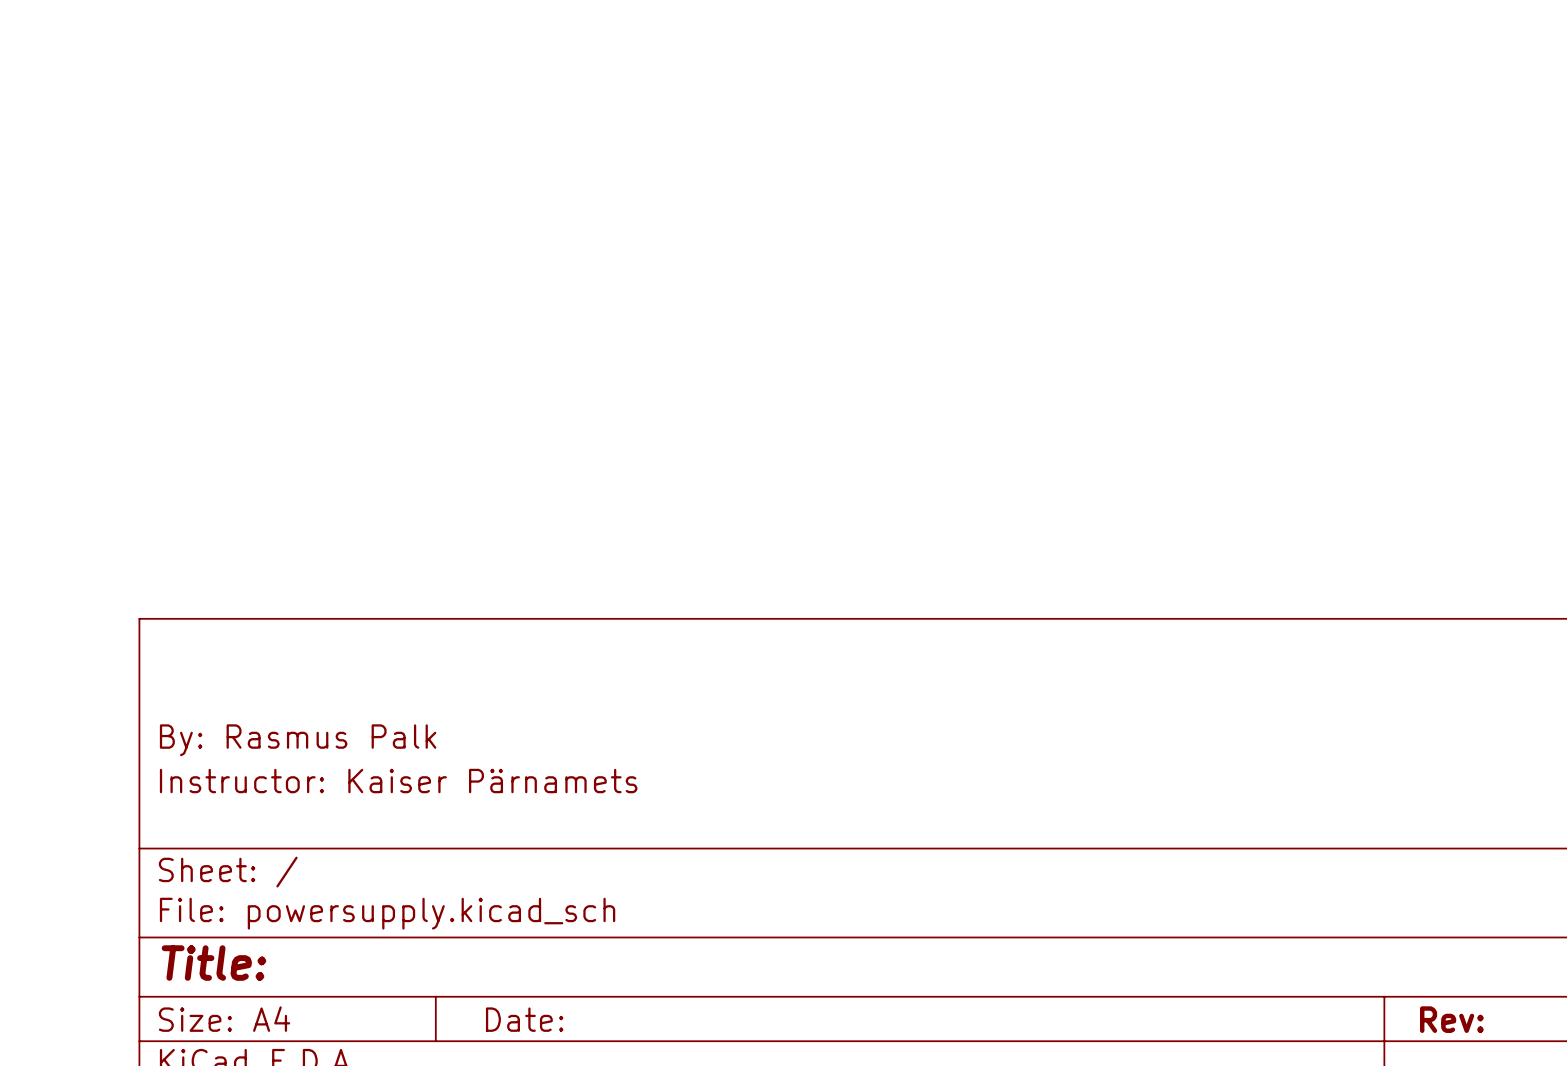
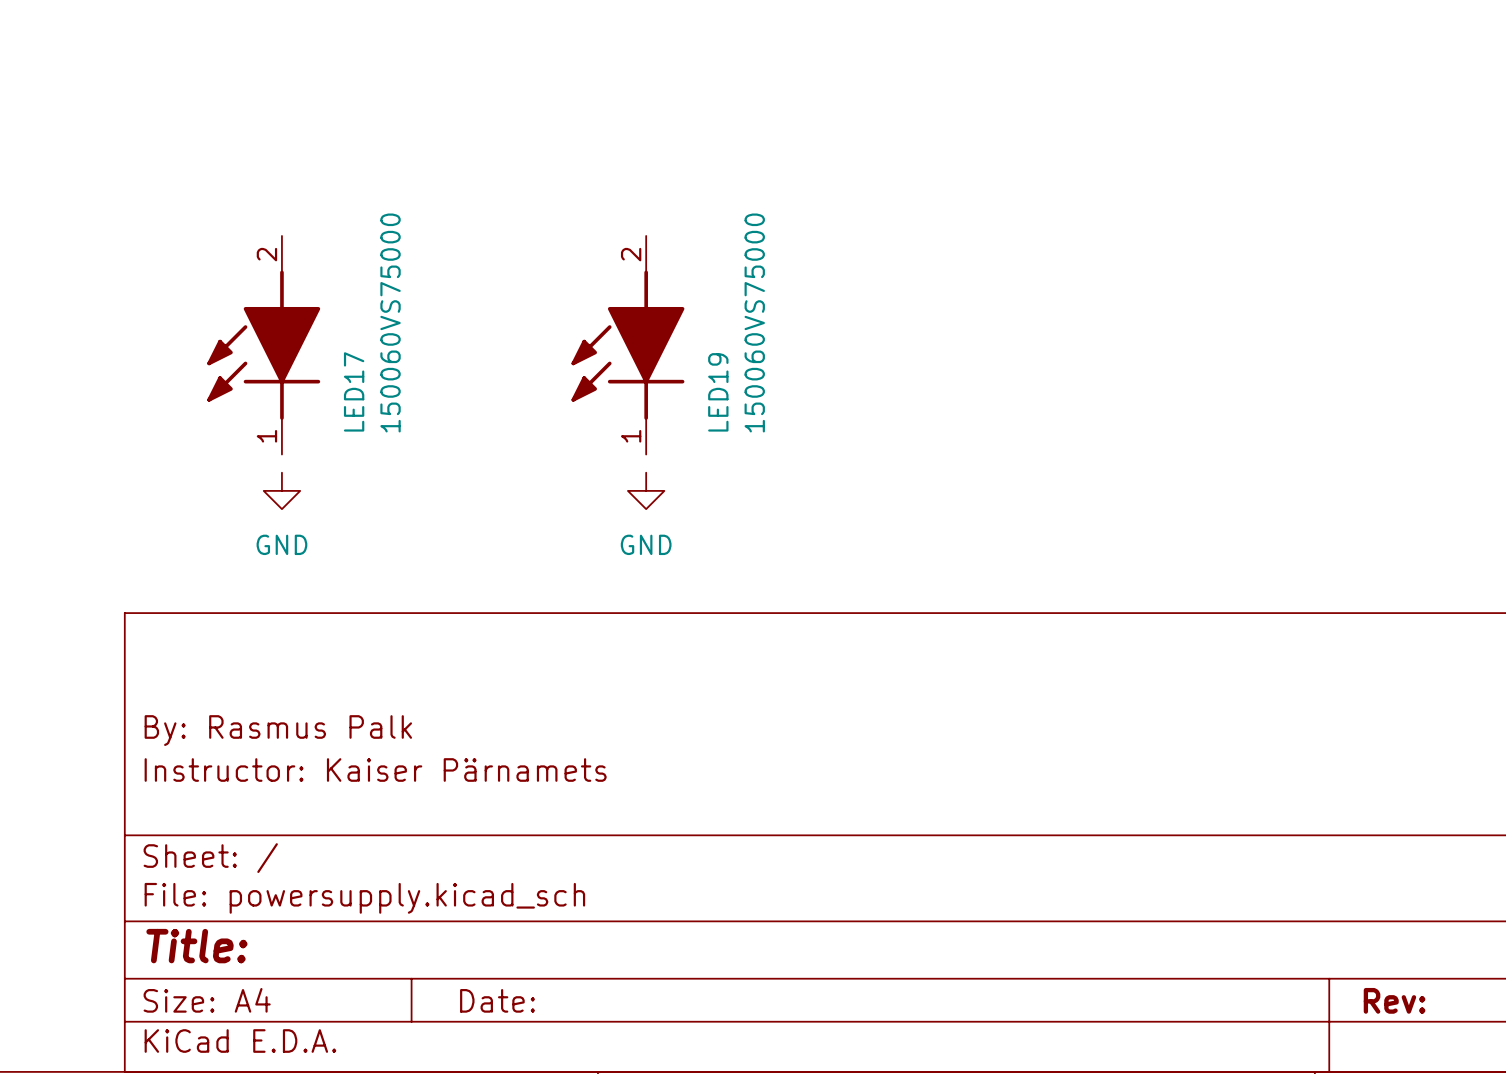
LED17: none -> 150060VS75000 (263, 345)
LED19: none -> 150060VS75000 (627, 345)
power symbol: none -> GND (281, 490)
power symbol: none -> GND (646, 490)

